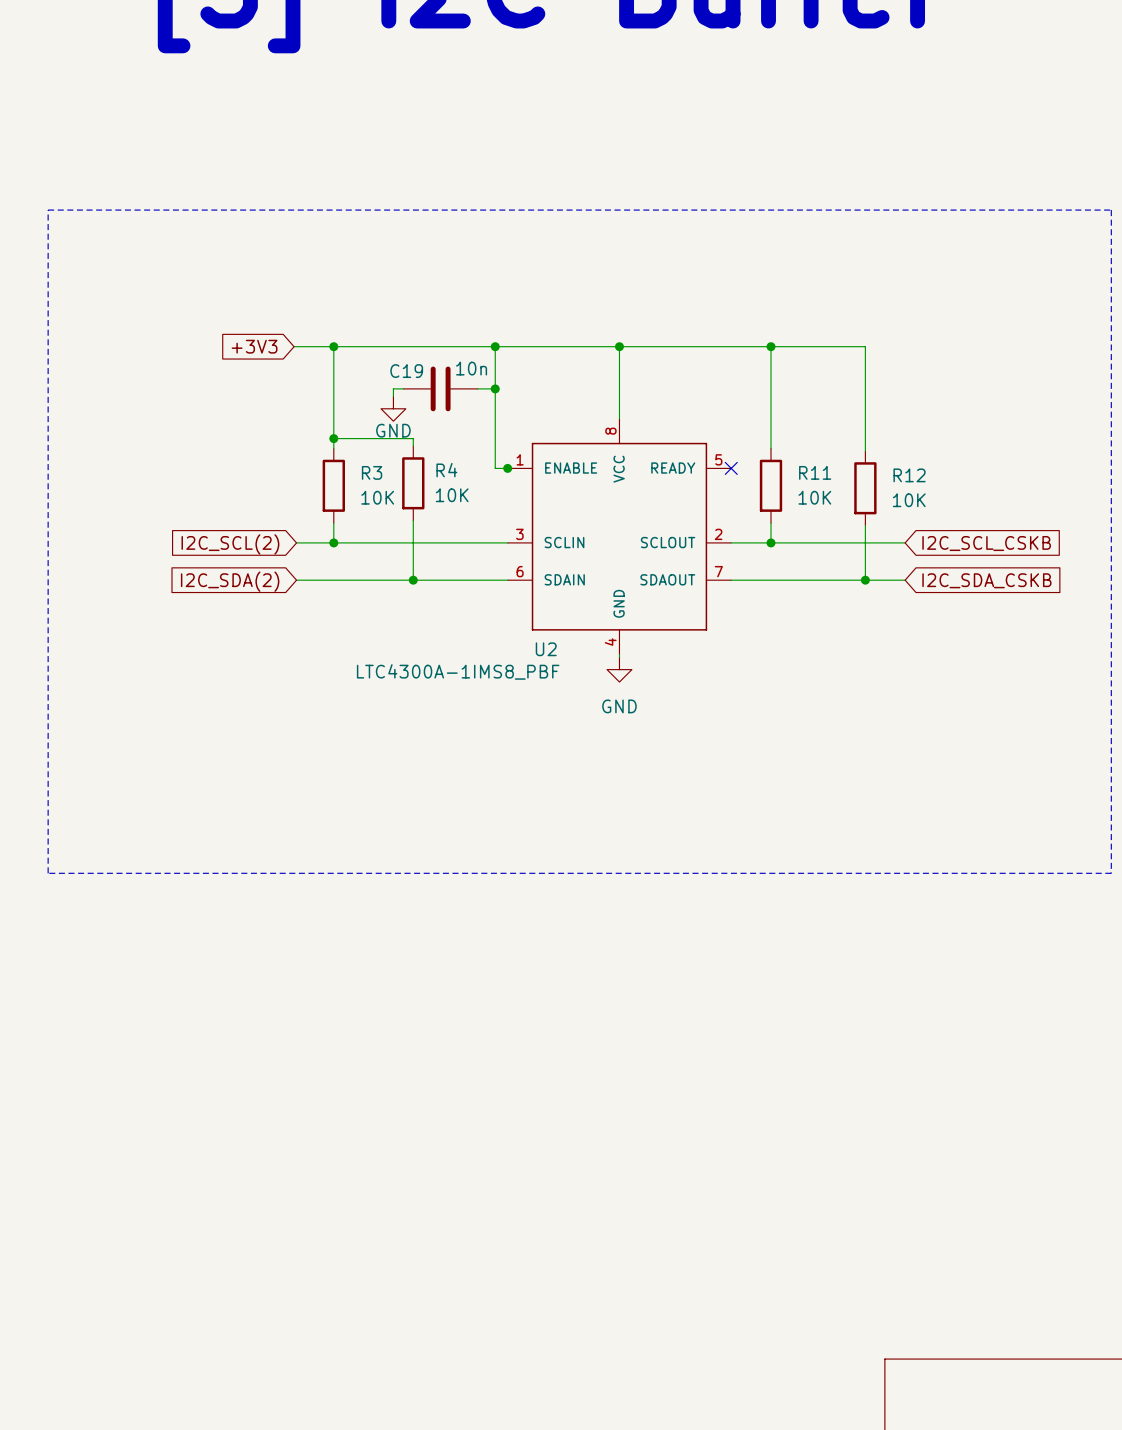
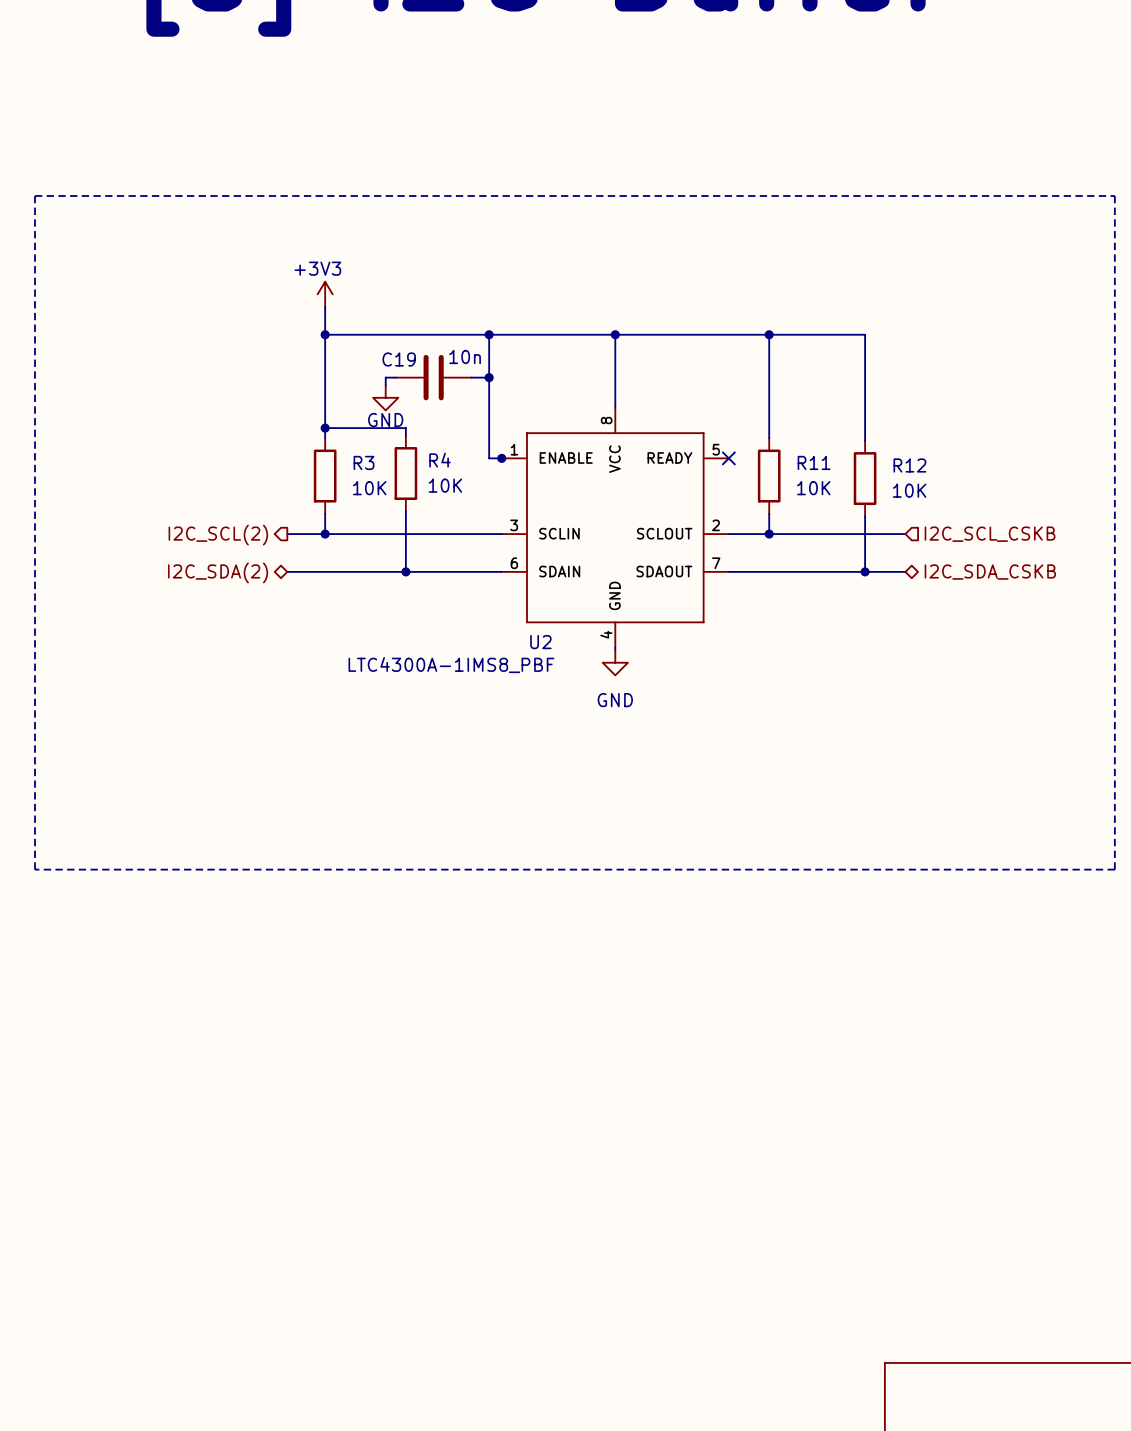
power symbol: none -> +3V3 (325, 294)
global label: +3V3 (254, 346) -> none
wire: (294, 346) (333, 346) -> (325, 306) (325, 334)
hierarchical label: none -> I2C_SCL(2) (218, 535)
global label: I2C_SCL_CSKB (986, 543) -> none
hierarchical label: none -> I2C_SCL_CSKB (990, 534)
global label: I2C_SCL(2) (230, 544) -> none
global label: I2C_SDA_CSKB (986, 580) -> none
hierarchical label: none -> I2C_SDA_CSKB (990, 572)
hierarchical label: none -> I2C_SDA(2) (218, 572)
global label: I2C_SDA(2) (230, 581) -> none

